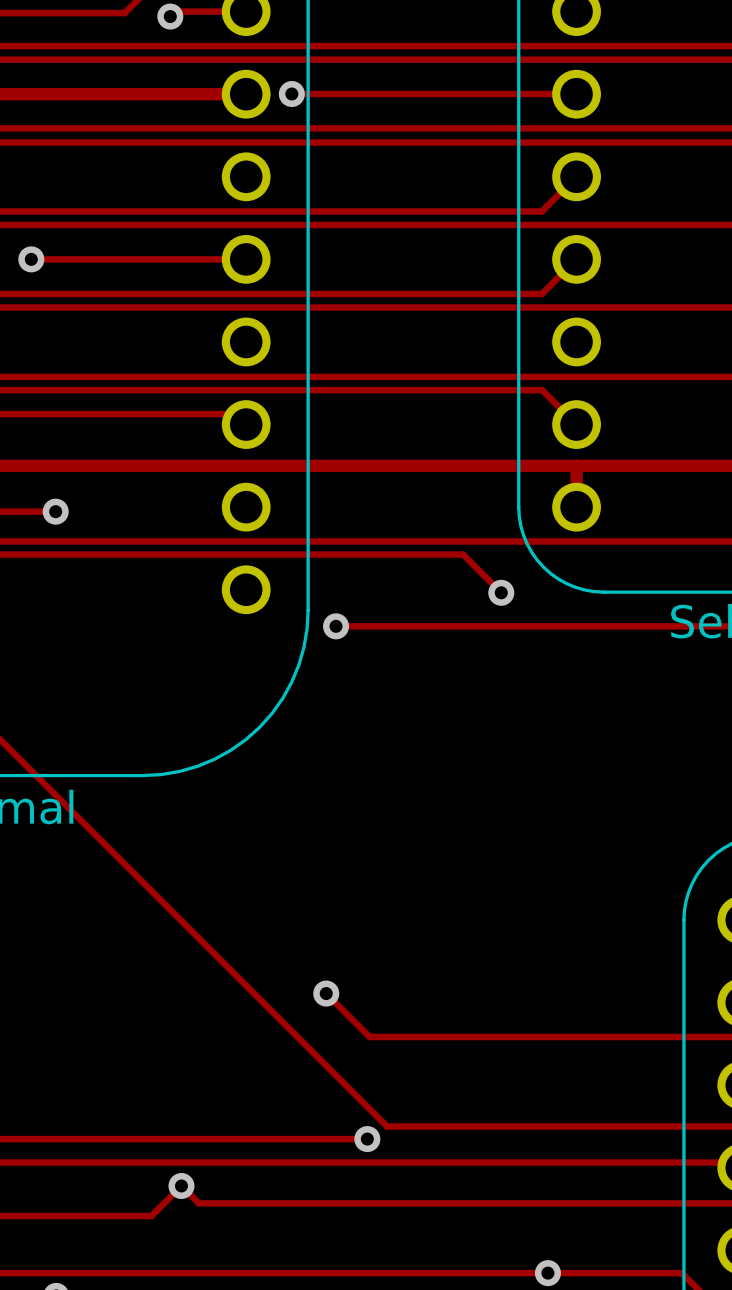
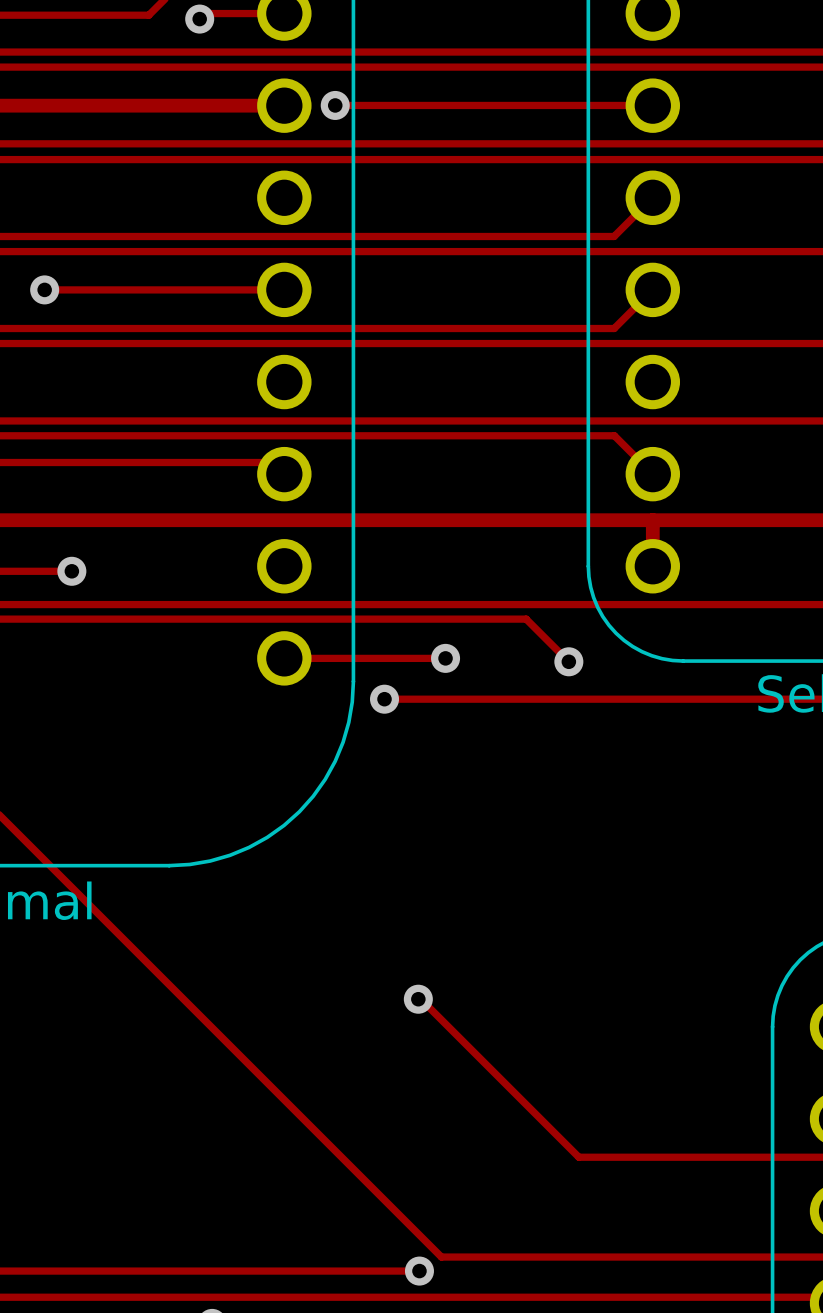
track: none -> (284, 658) (445, 658)
via: none -> (445, 658)
track: (326, 993) (369, 1037) (510, 1037) -> (418, 999) (420, 999) (578, 1157)
via position: (326, 993) -> (418, 999)

